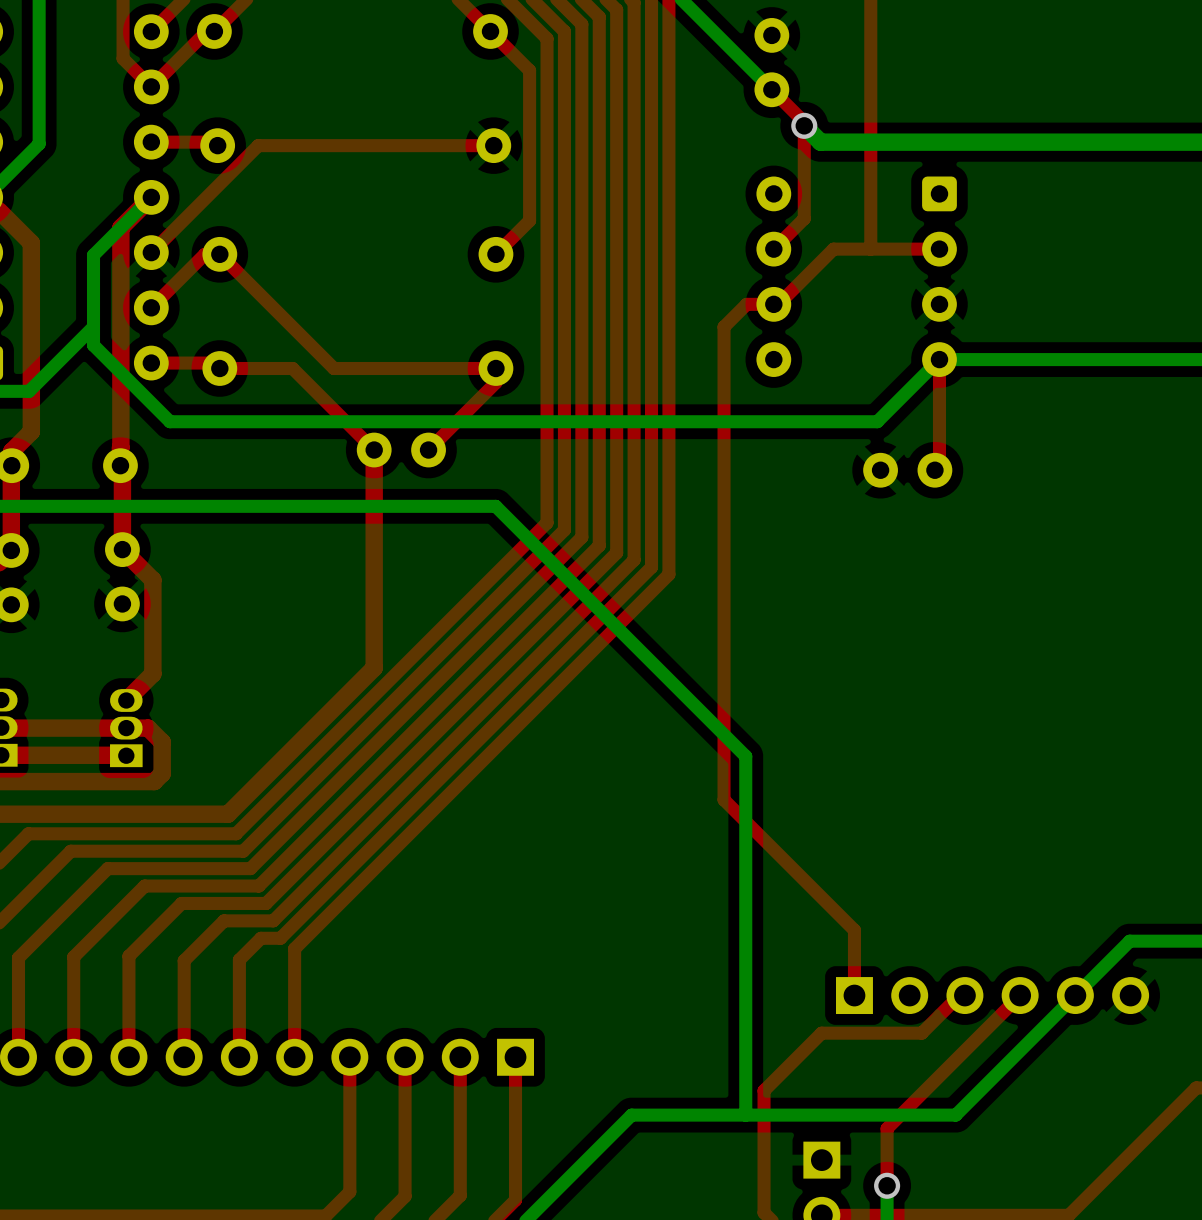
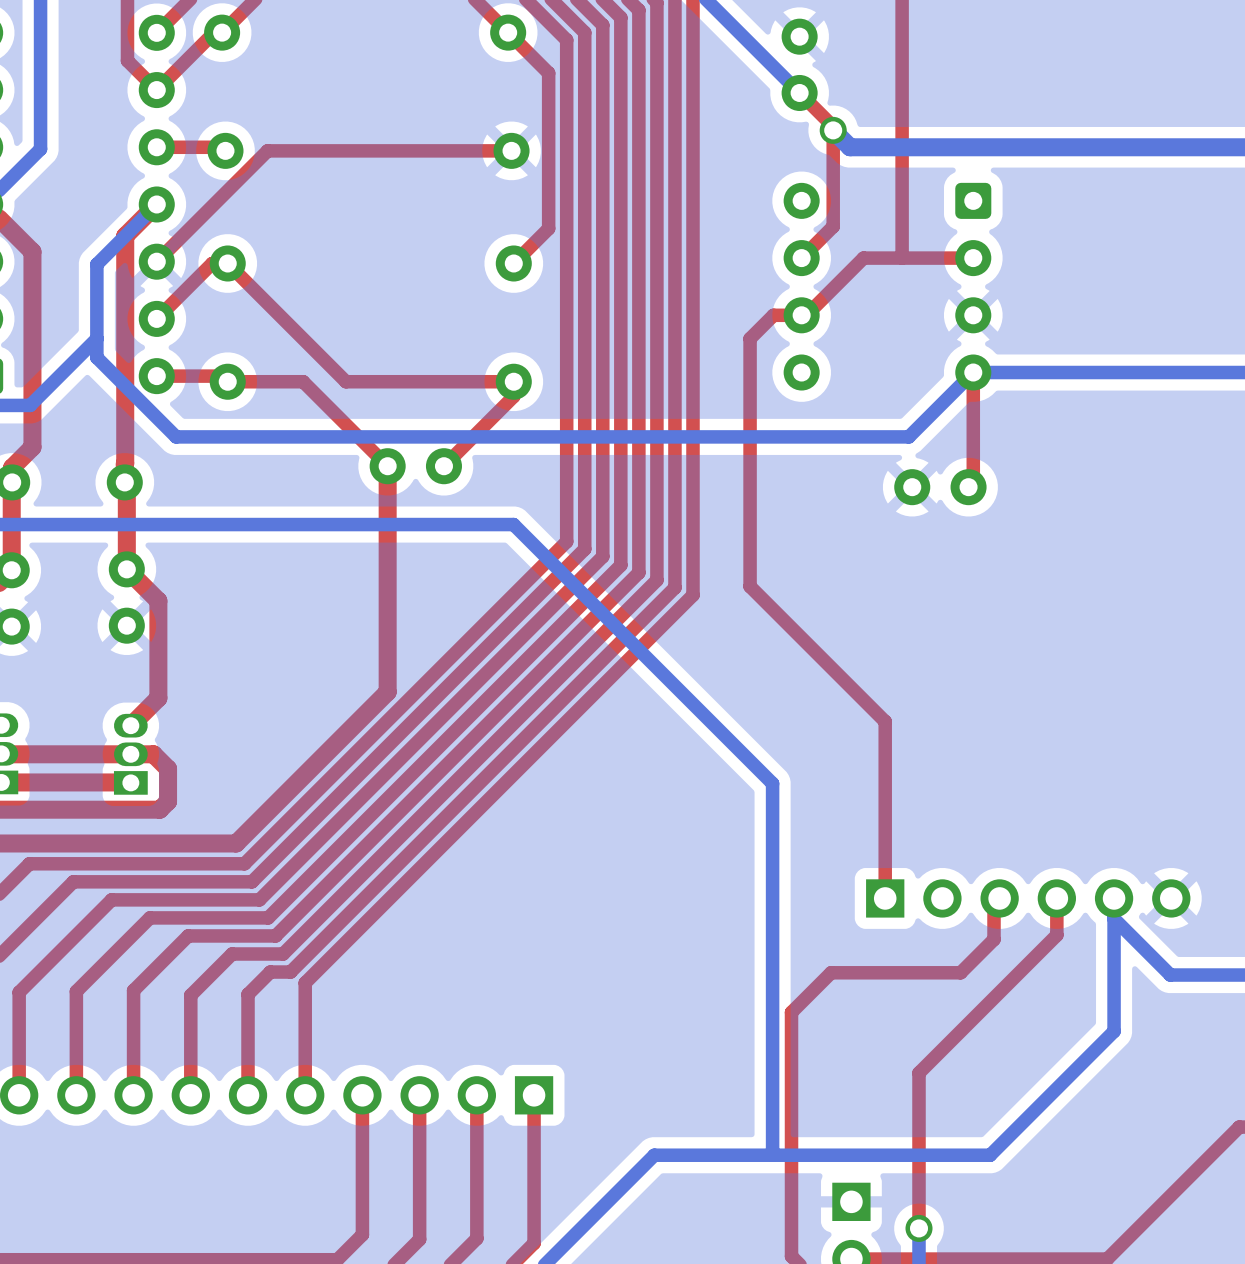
top track: (724, 566) (724, 799) (854, 930) (854, 995) -> (750, 586) (885, 721) (885, 898)
bottom track: none -> (1114, 918) (1170, 975)
bottom track: (1129, 941) (1075, 995) -> (1114, 898) (1114, 1031)
top track: (964, 995) (959, 995) (921, 1033) (821, 1033) (764, 1090) -> (999, 898) (994, 904) (994, 939) (960, 972) (831, 972) (791, 1012) (791, 1130)
part position: (992, 995) -> (1028, 898)
top track: (1020, 995) (887, 1128) -> (1056, 898) (1056, 935) (919, 1073) (919, 1169)

